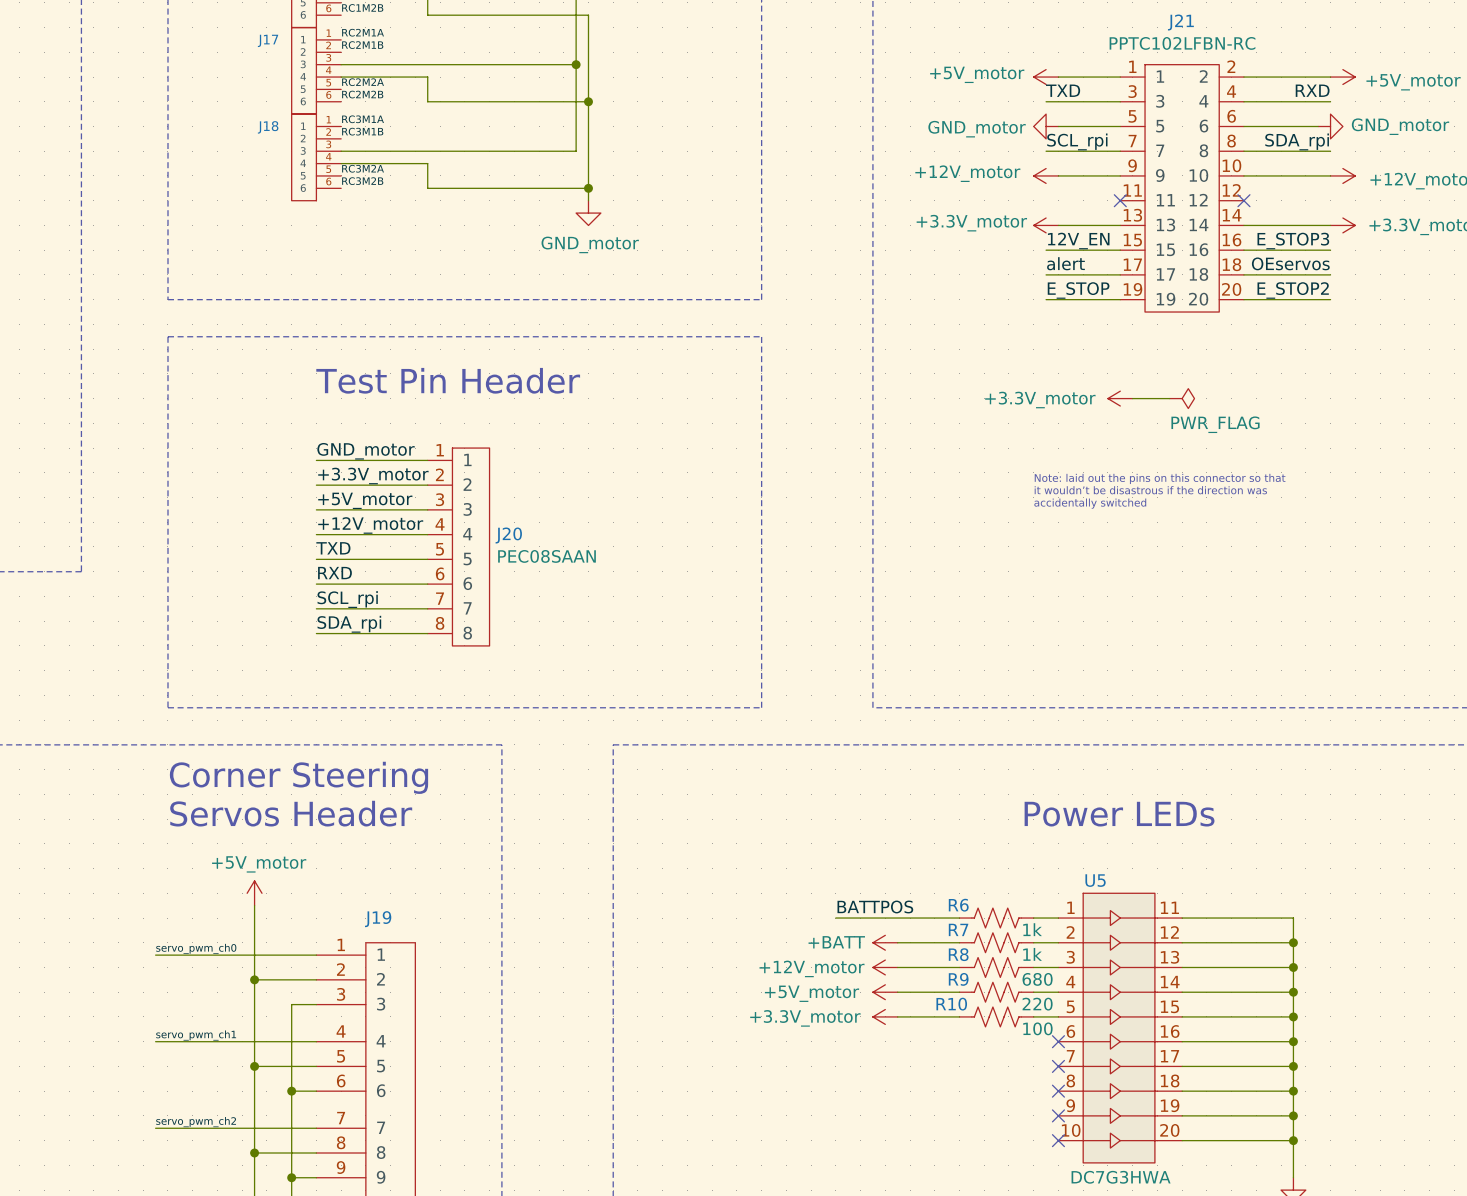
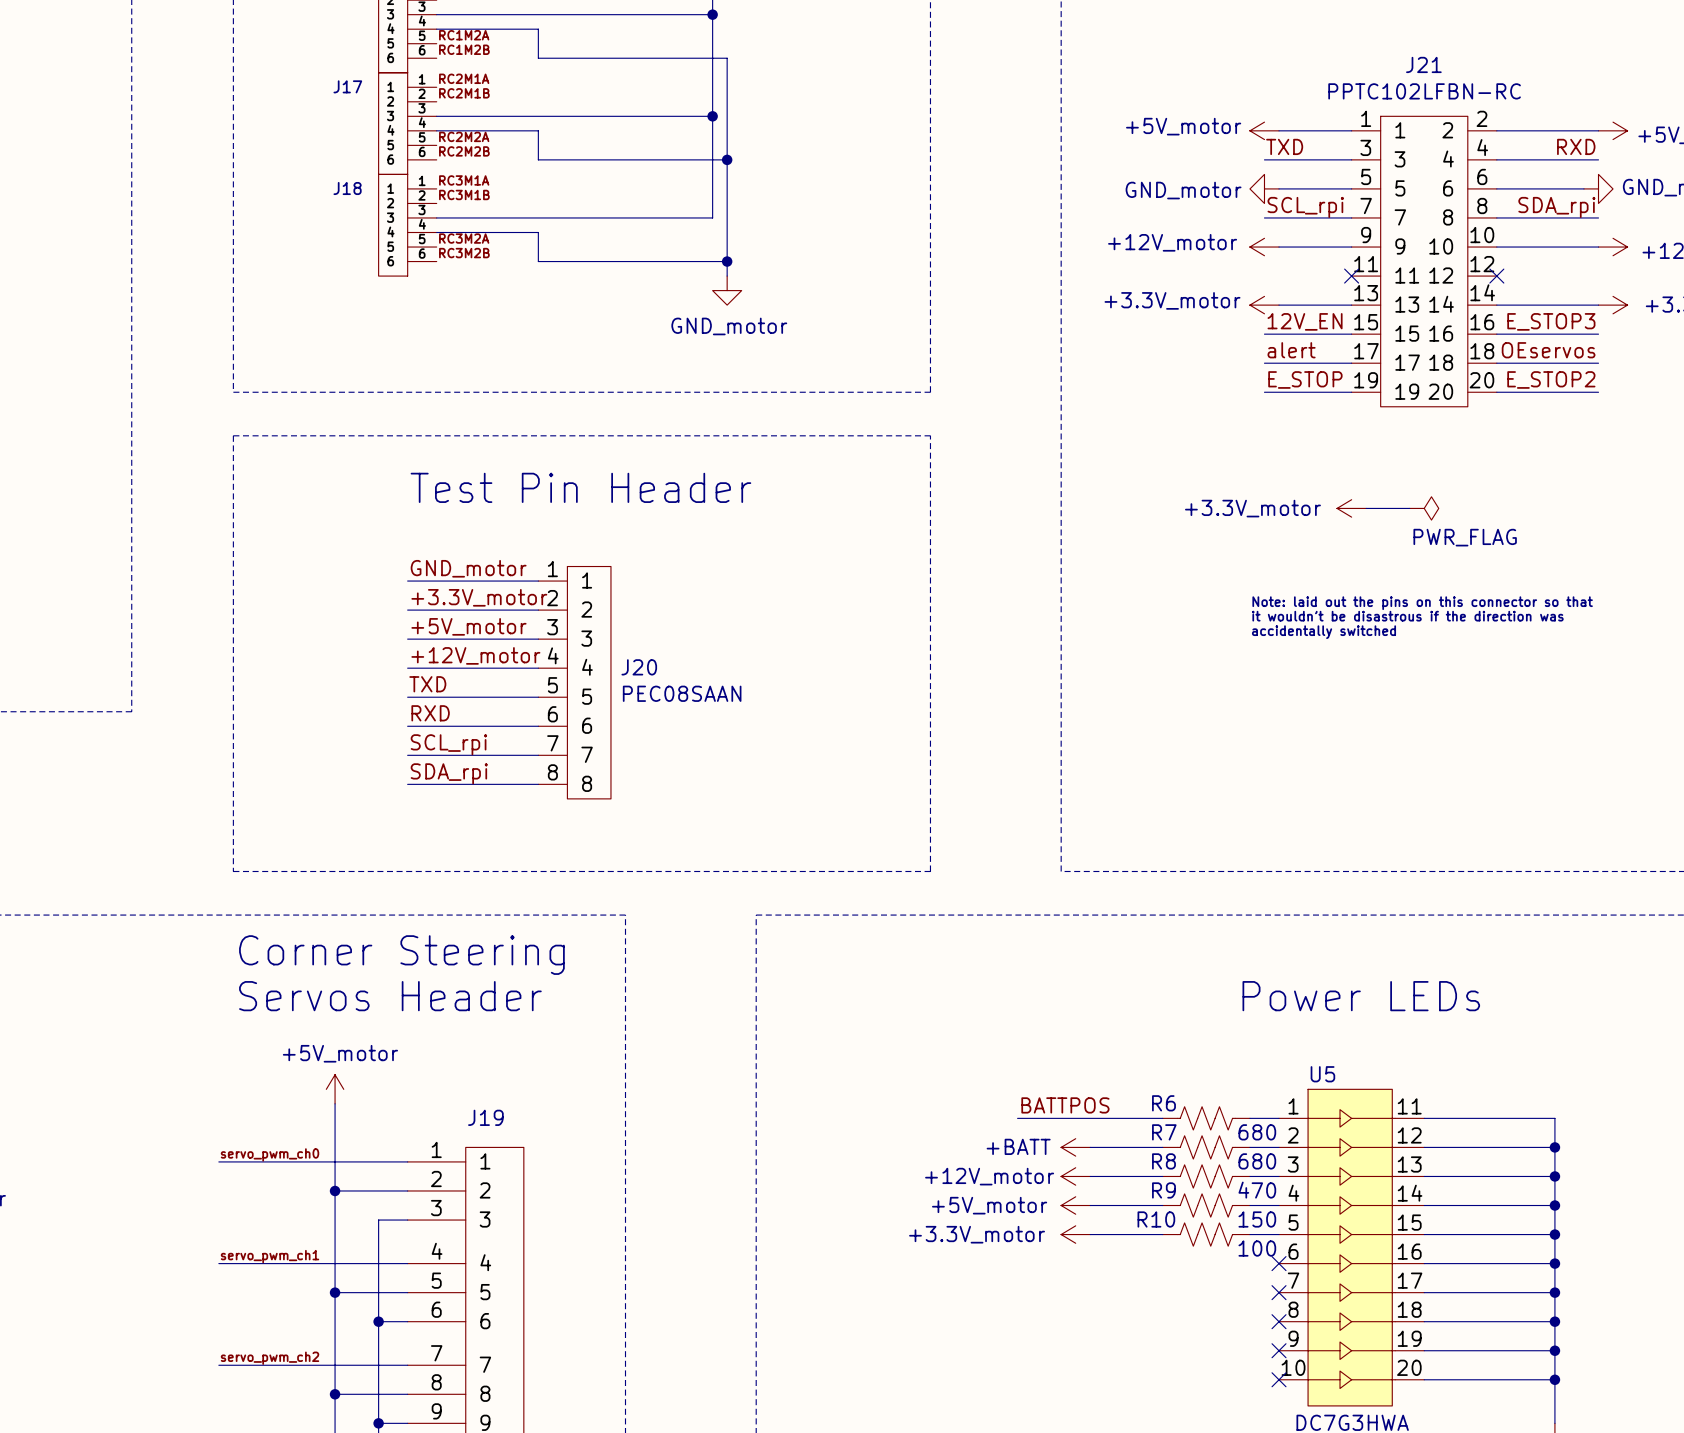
R6 value: 1k (1032, 929) -> 680 (1257, 1132)
R7 value: 1k (1032, 954) -> 680 (1257, 1161)
R8 value: 680 (1037, 979) -> 470 (1257, 1190)
R9 value: 220 (1037, 1004) -> 150 (1257, 1219)

